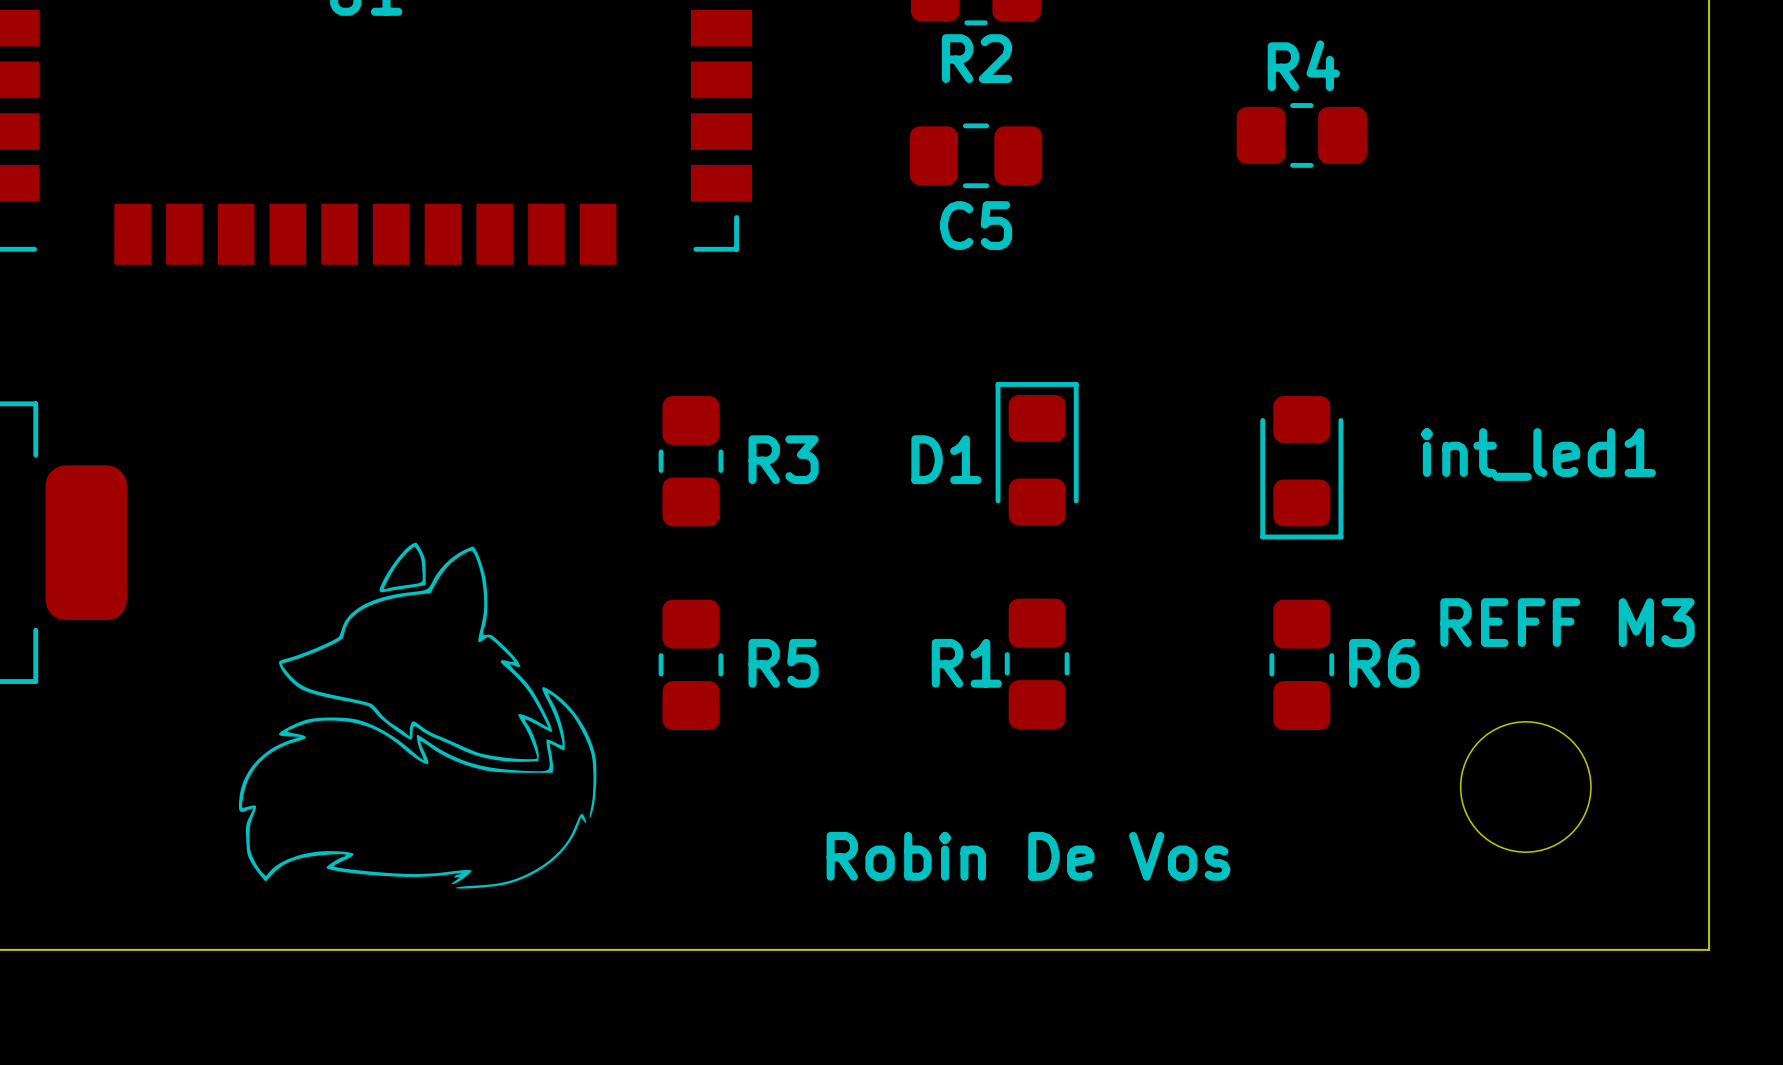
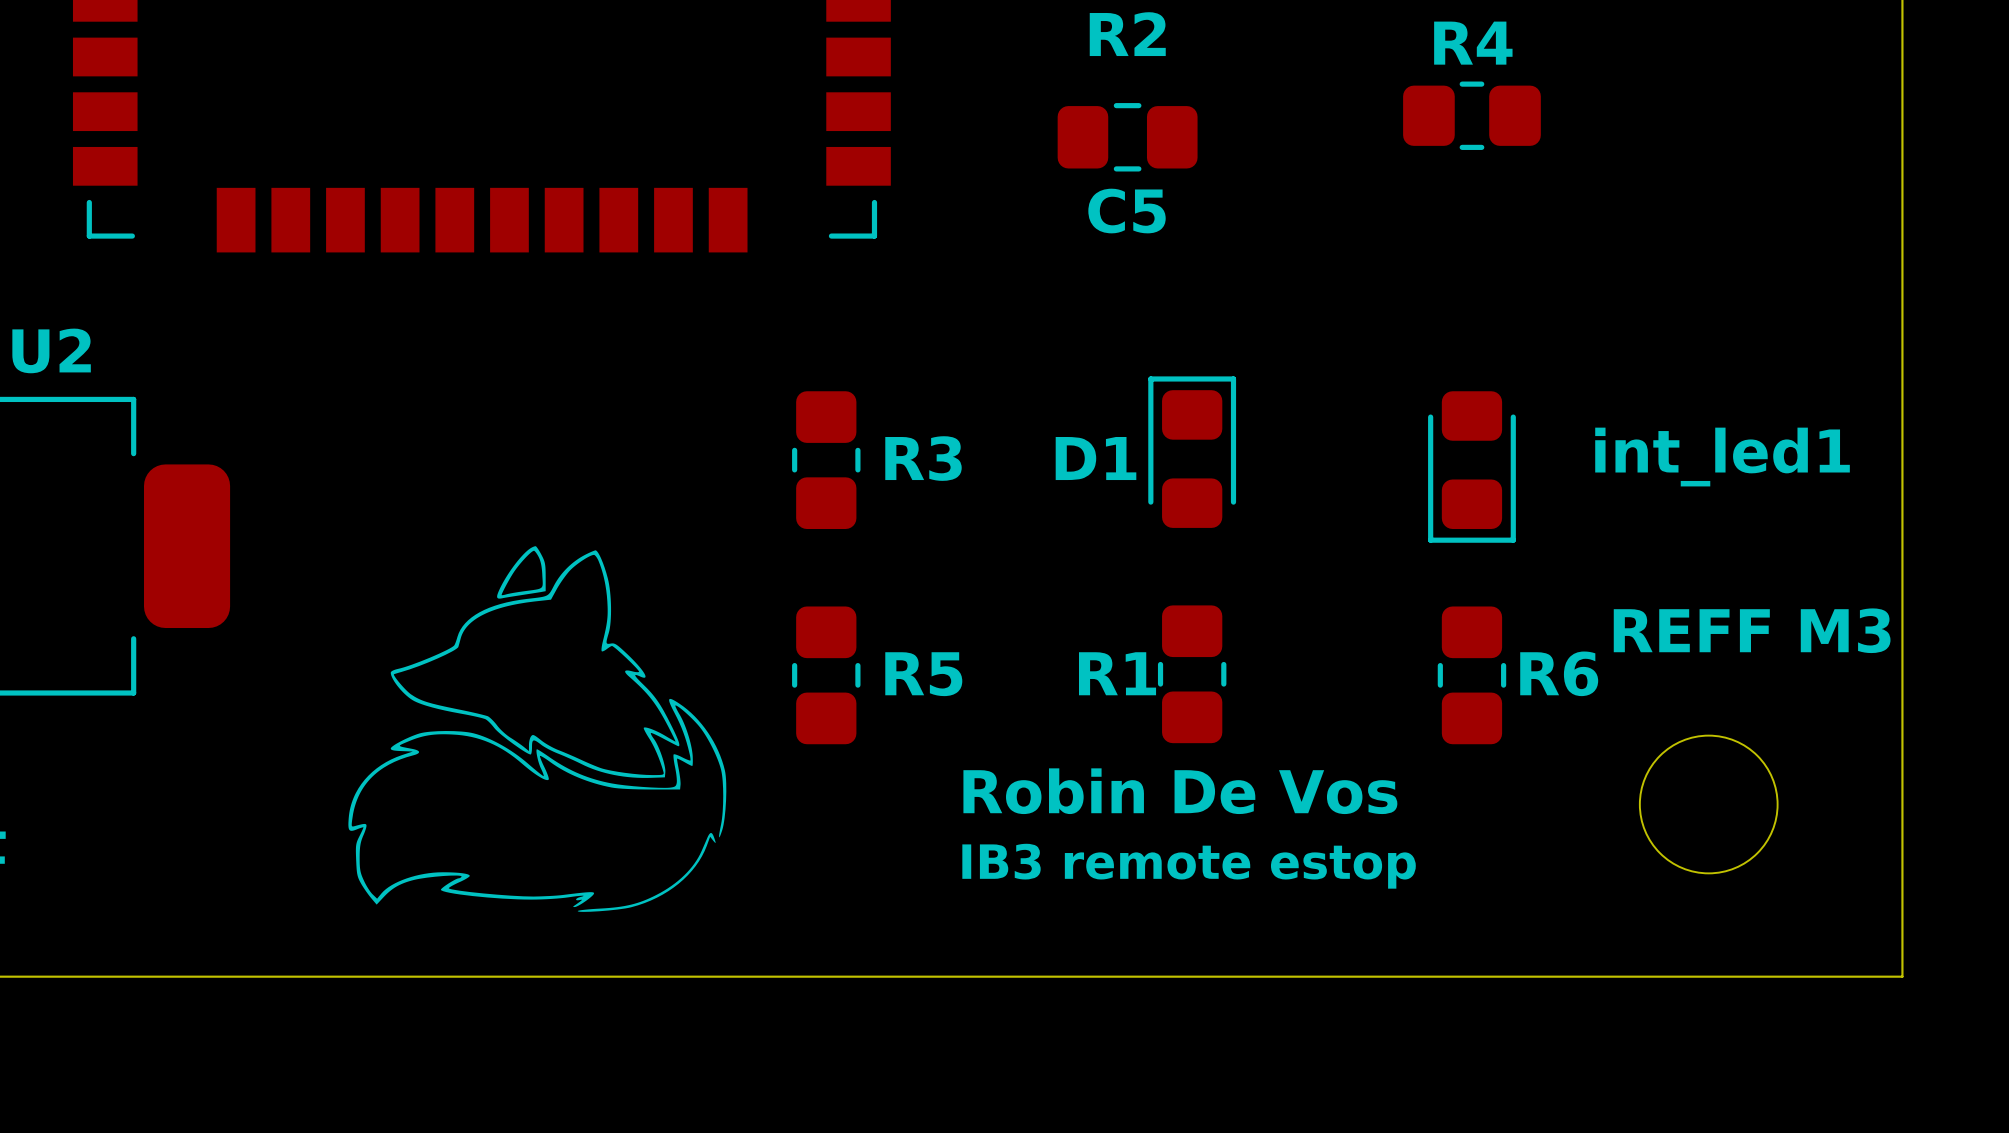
text: none -> Robin De Vos (1180, 791)
text: Robin De Vos (1028, 856) -> IB3 remote estop (1189, 866)

